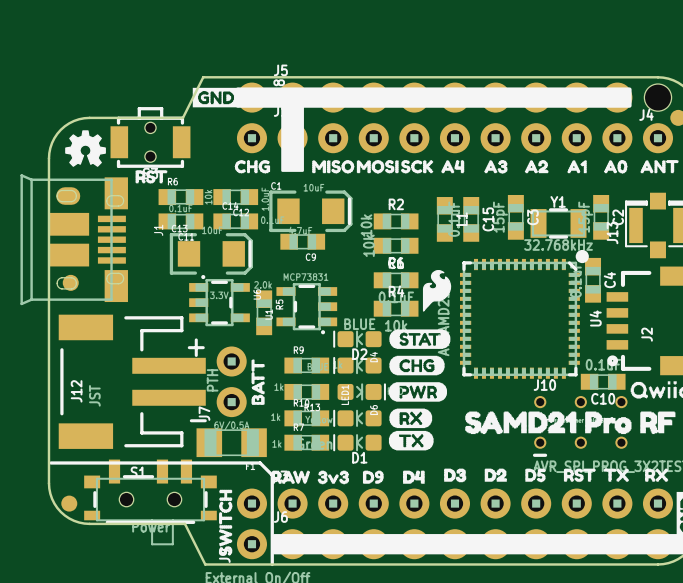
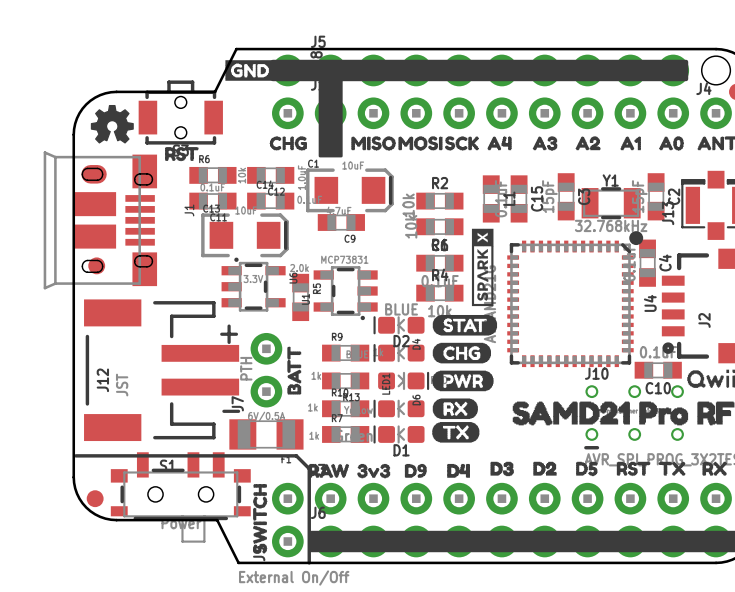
drawing shape: [281, 95, 304, 172] -> [318, 68, 343, 158]
drawing shape: [422, 270, 452, 312] -> [471, 228, 494, 307]

